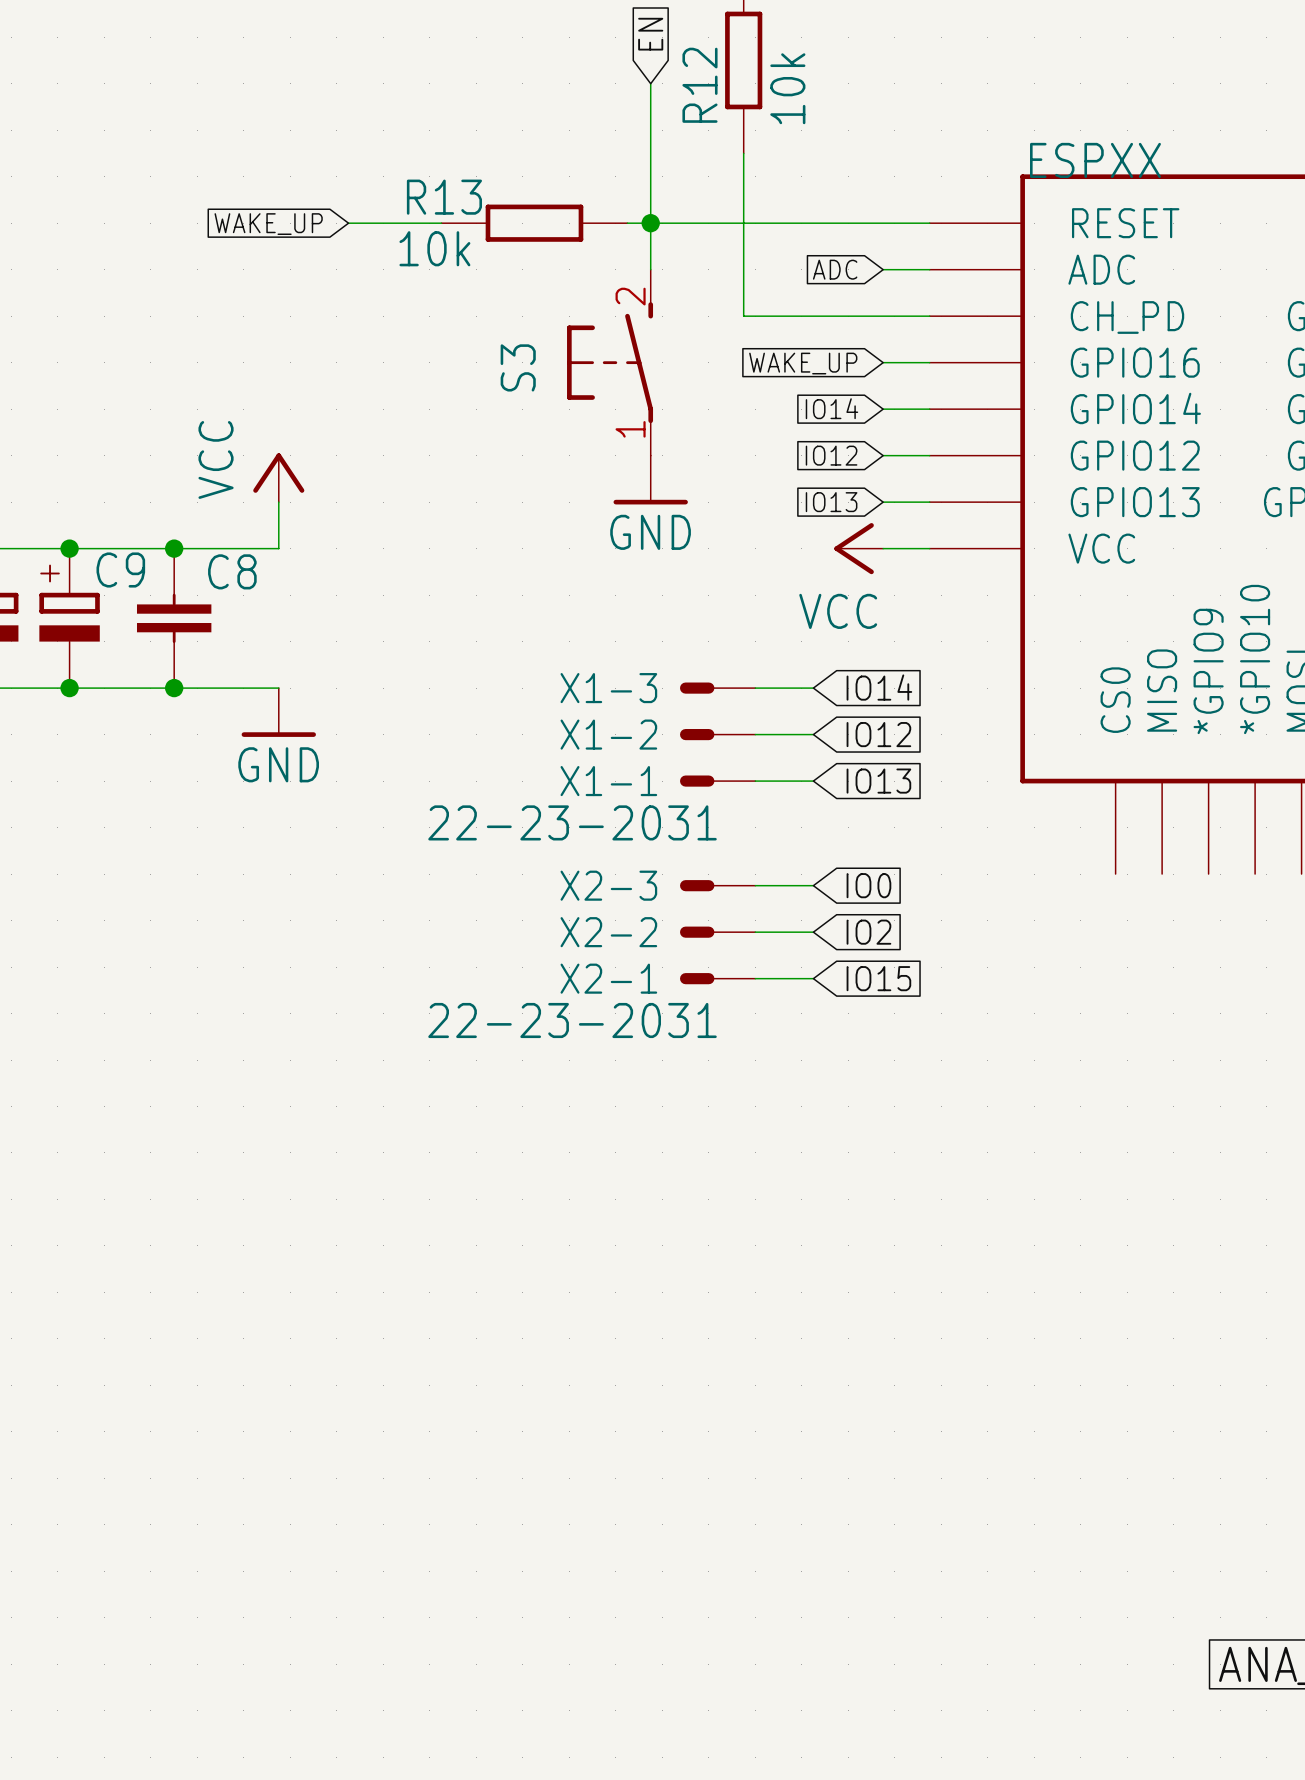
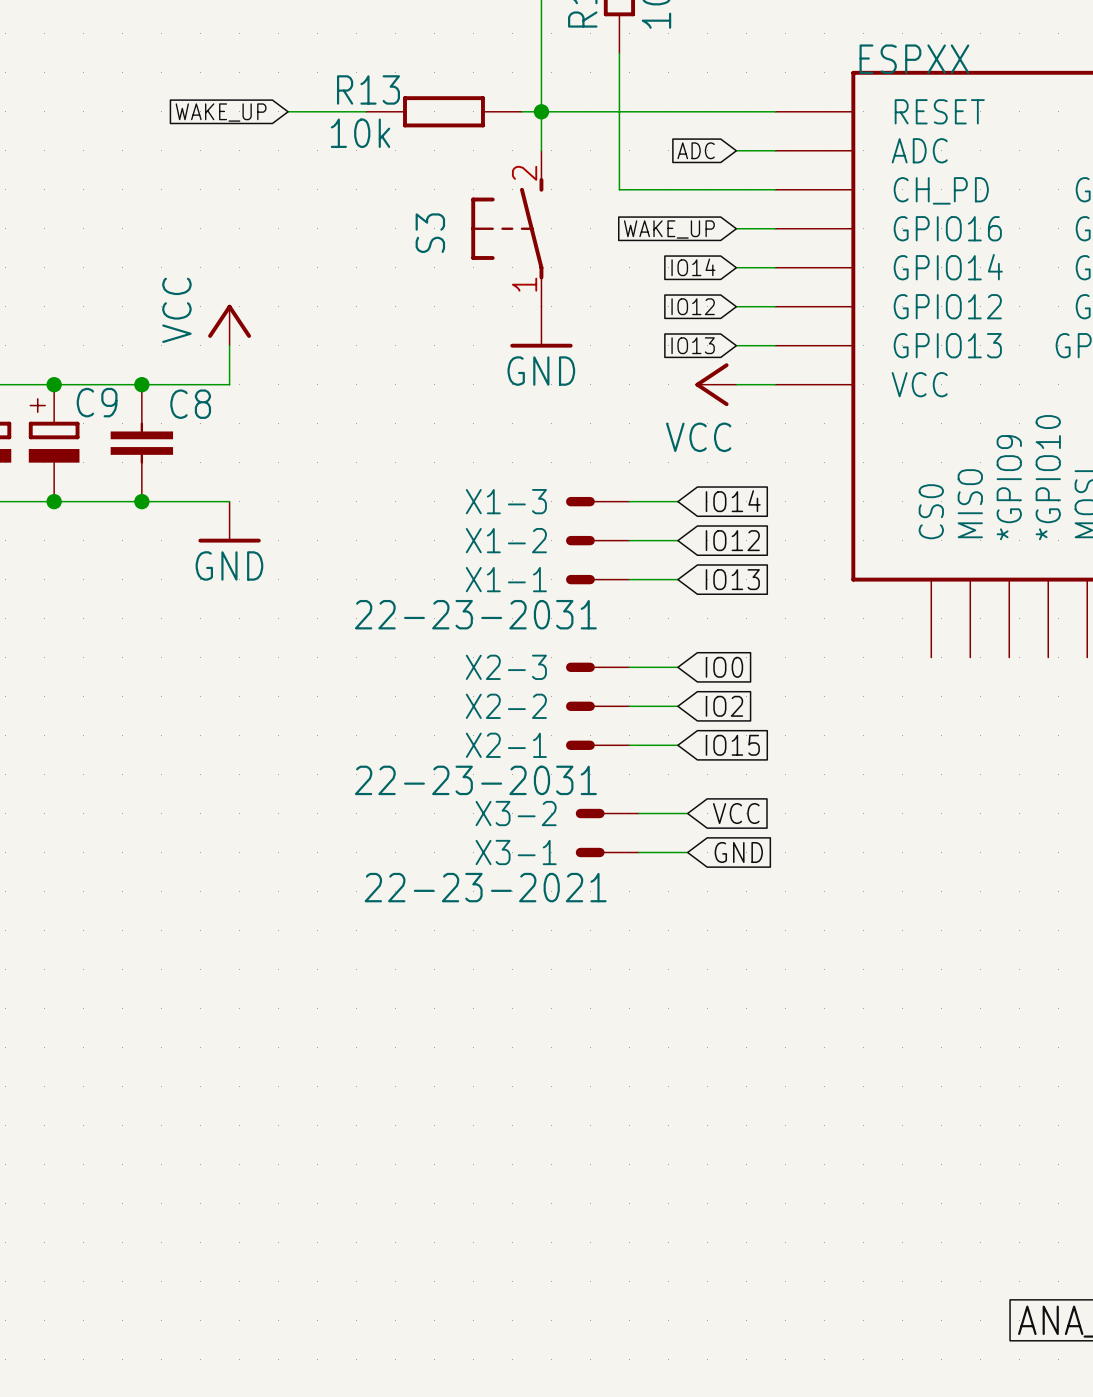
X3-2: none -> (607, 813)
wire: none -> (638, 813) (687, 813)
global label: none -> VCC (736, 813)
X3-1: none -> 22-23-2021 (607, 852)
wire: none -> (638, 852) (687, 852)
global label: none -> GND (738, 852)

